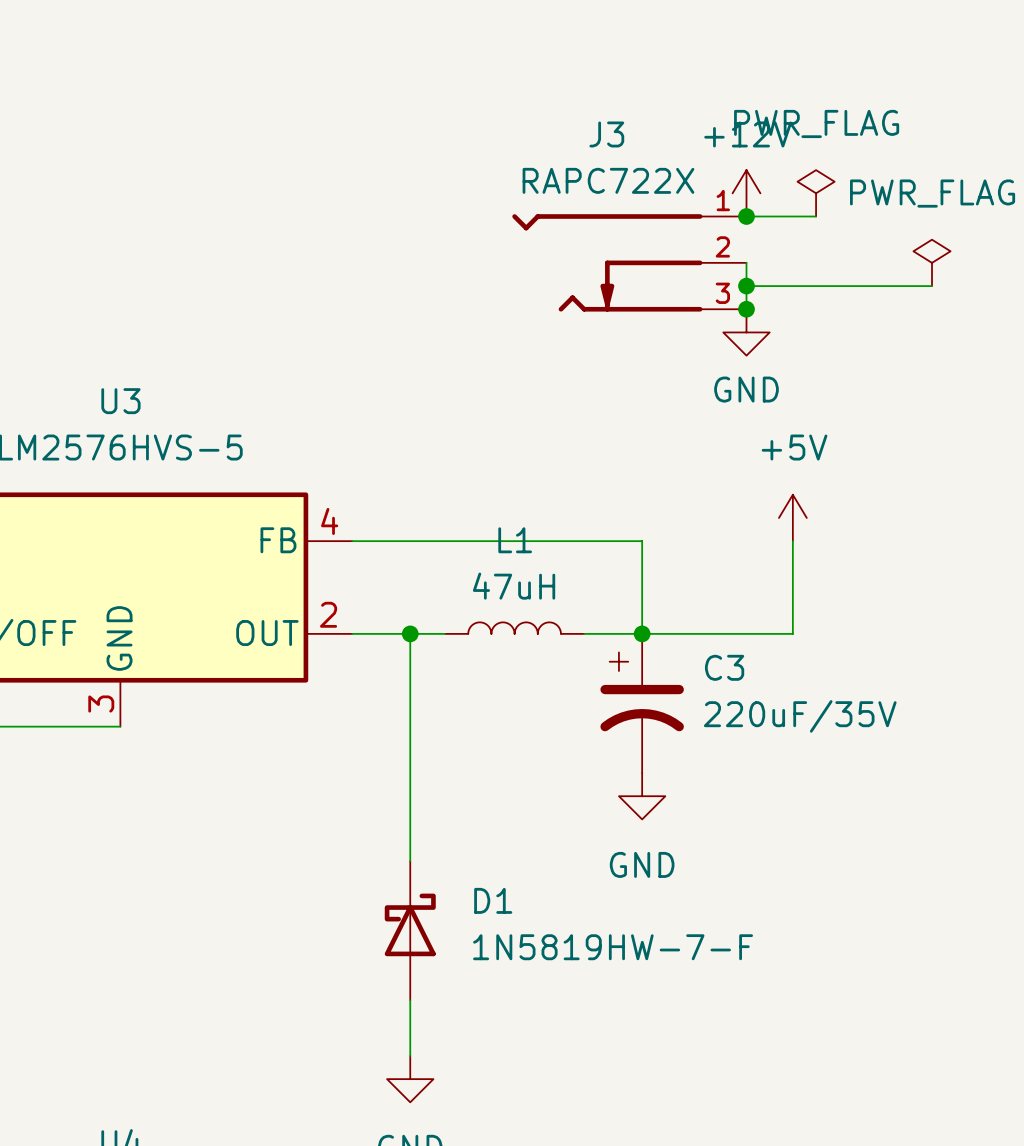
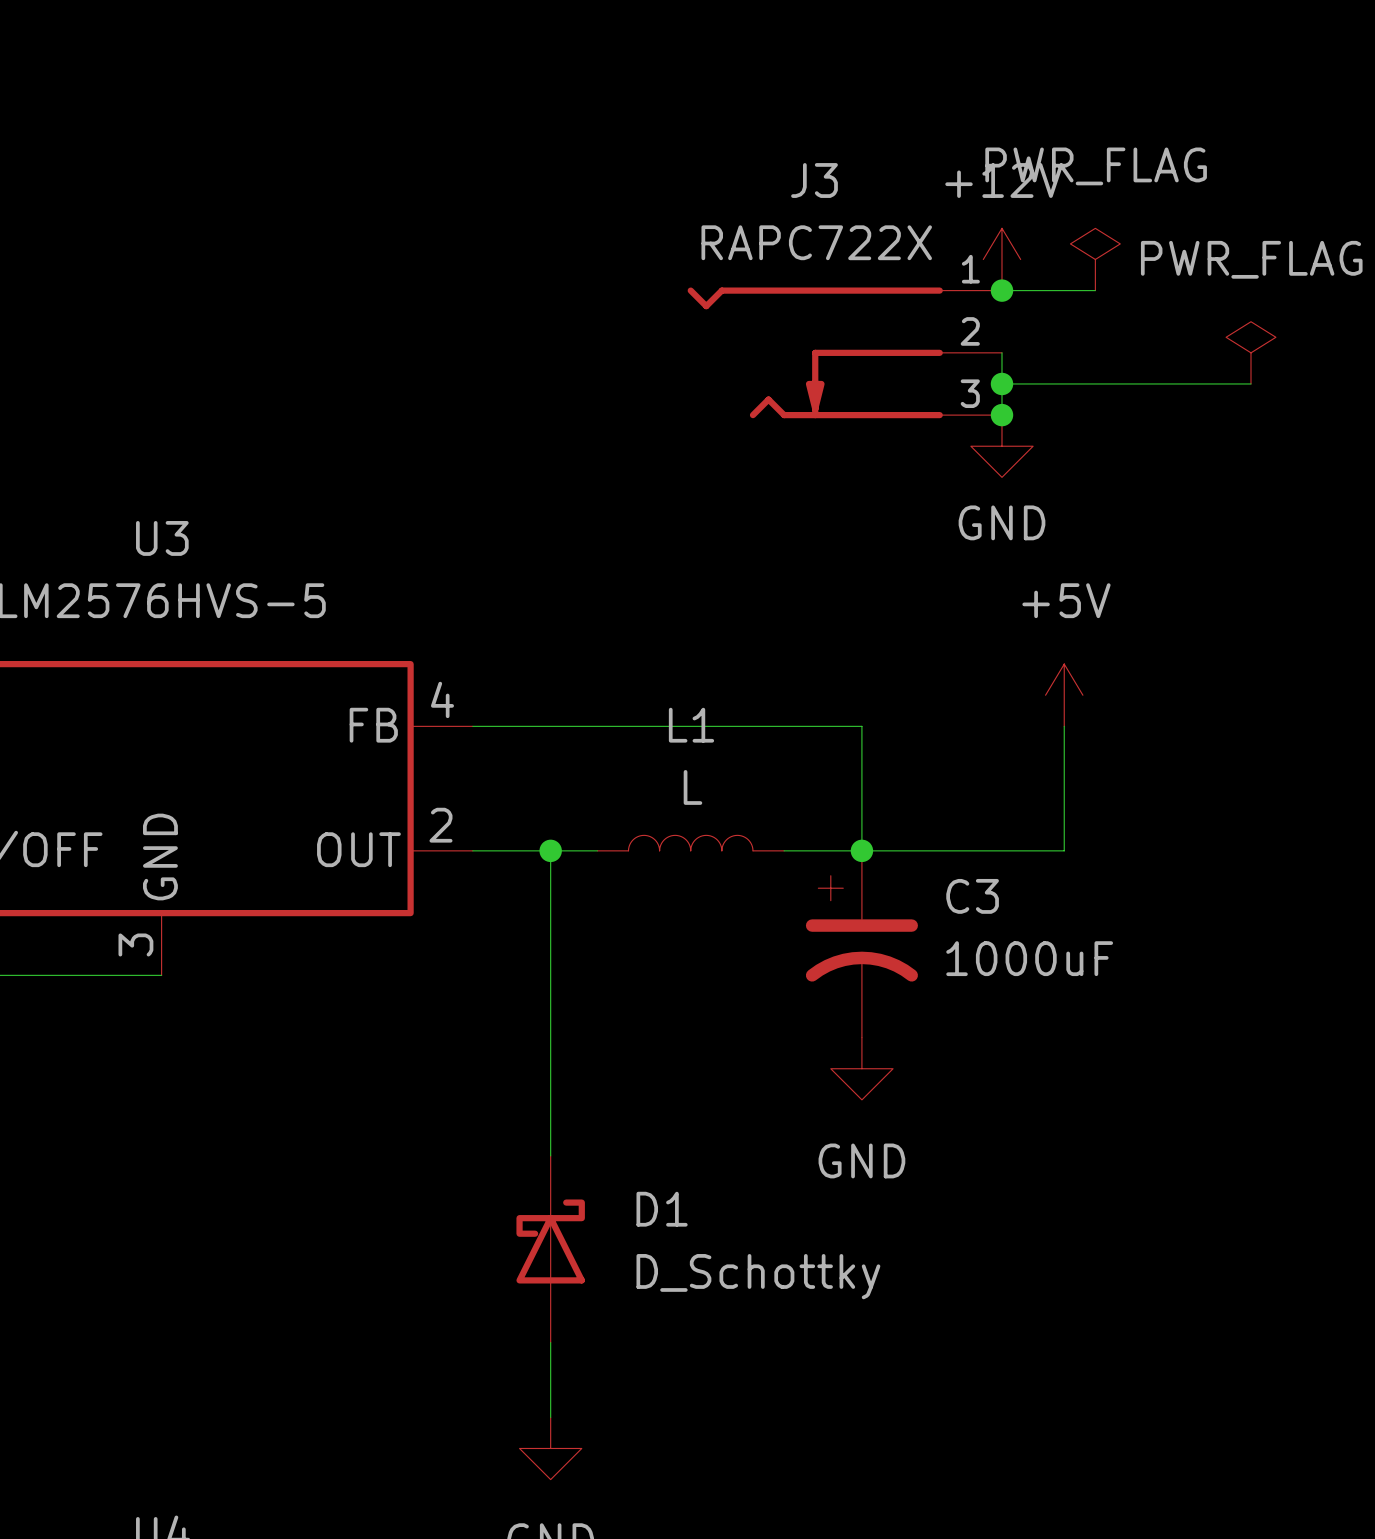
L1 value: 47uH (514, 586) -> L (692, 787)
C3 value: 220uF/35V (800, 716) -> 1000uF (1029, 958)
D1 value: 1N5819HW-7-F (613, 947) -> D_Schottky (758, 1276)

